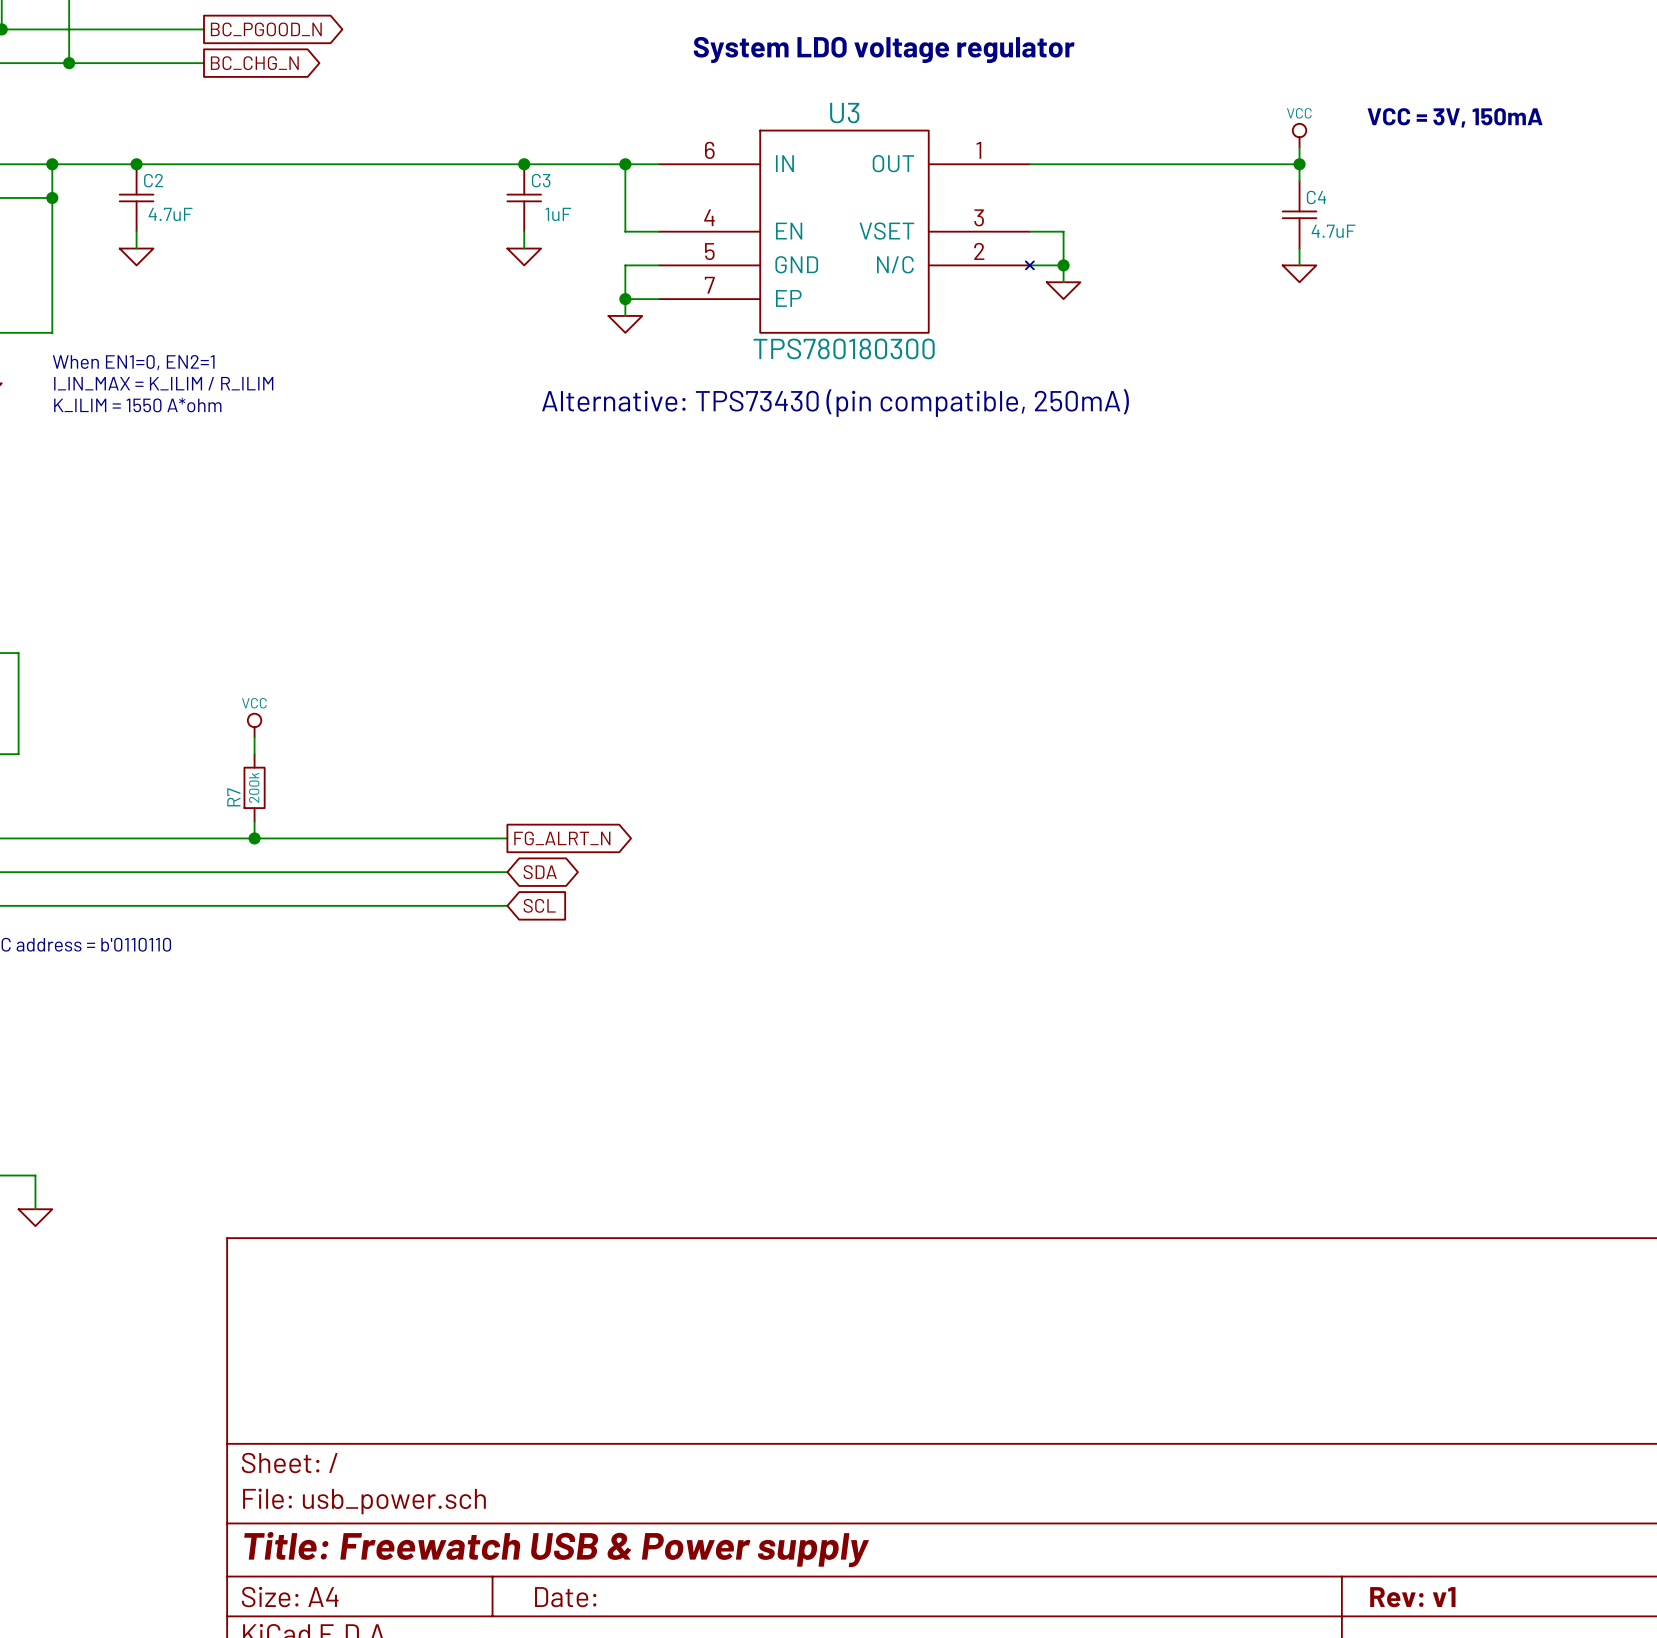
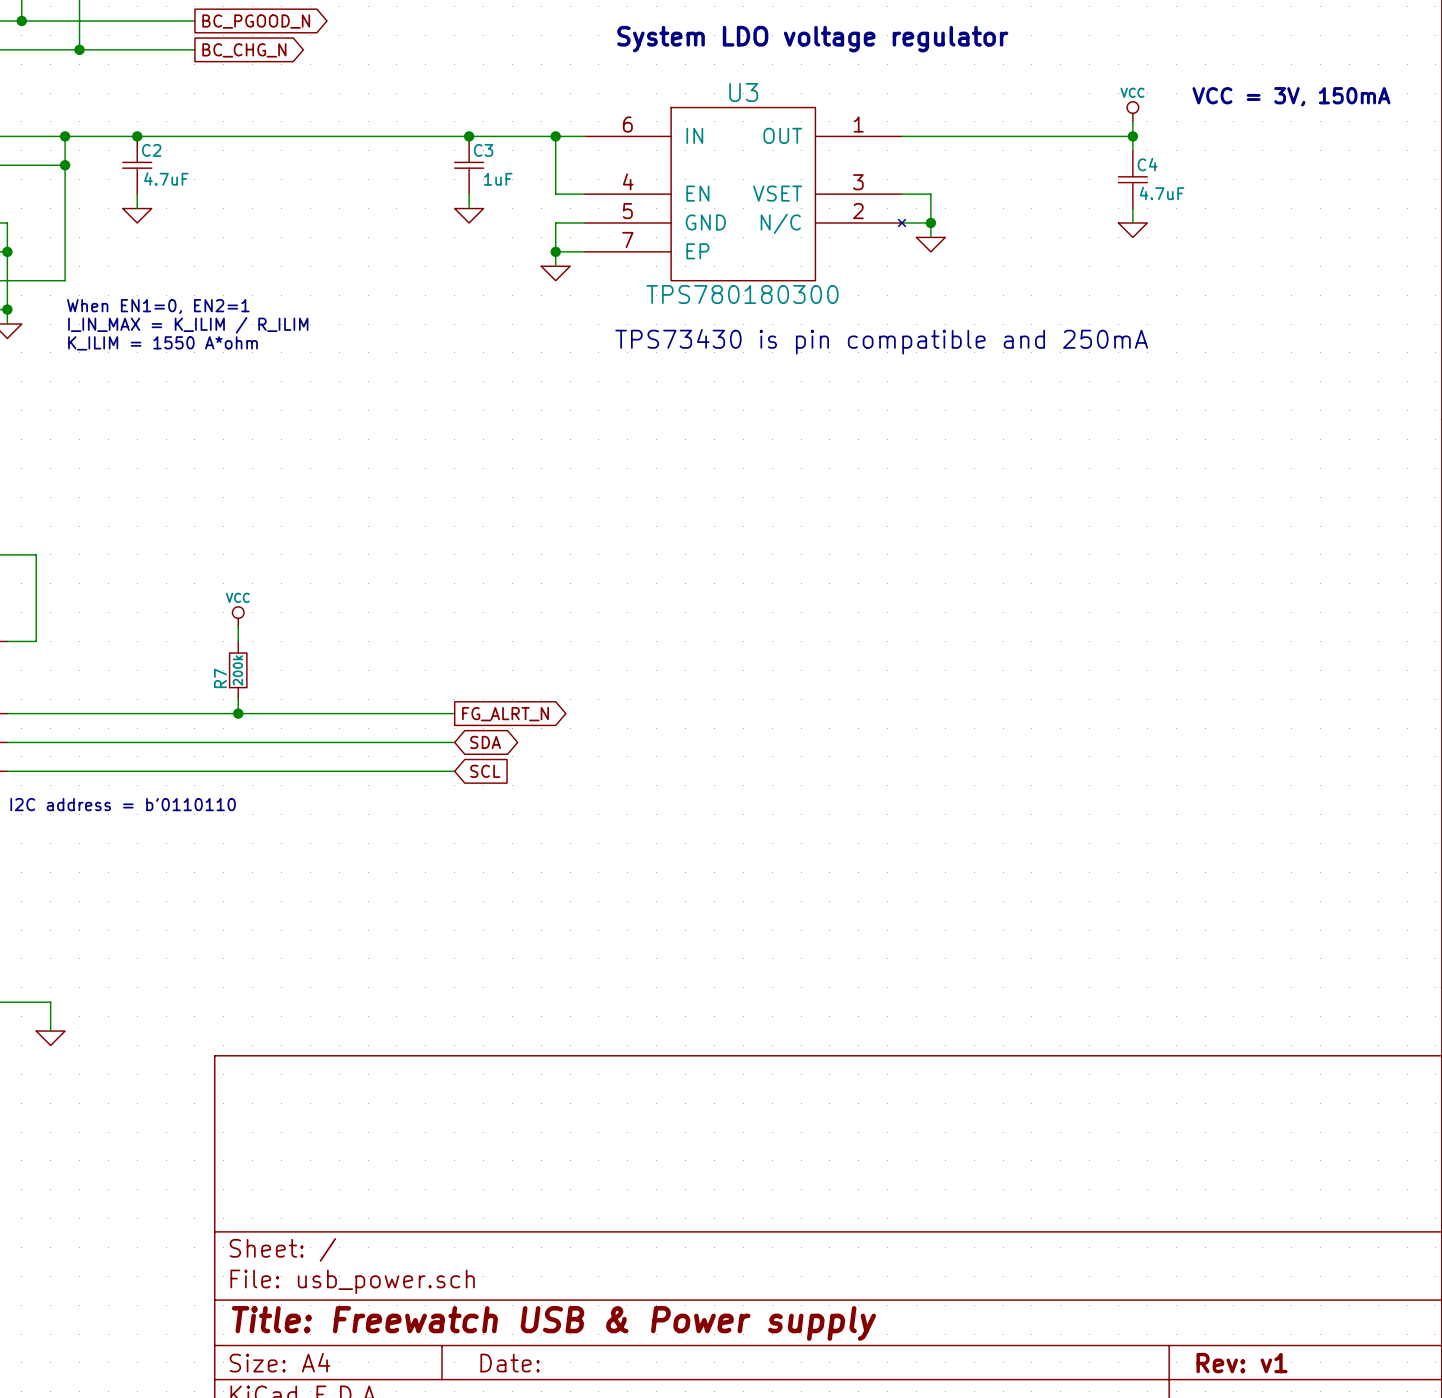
text: Alternative: TPS73430 (pin compatible, 250mA) (835, 403) -> TPS73430 is pin compatible and 250mA (881, 341)

